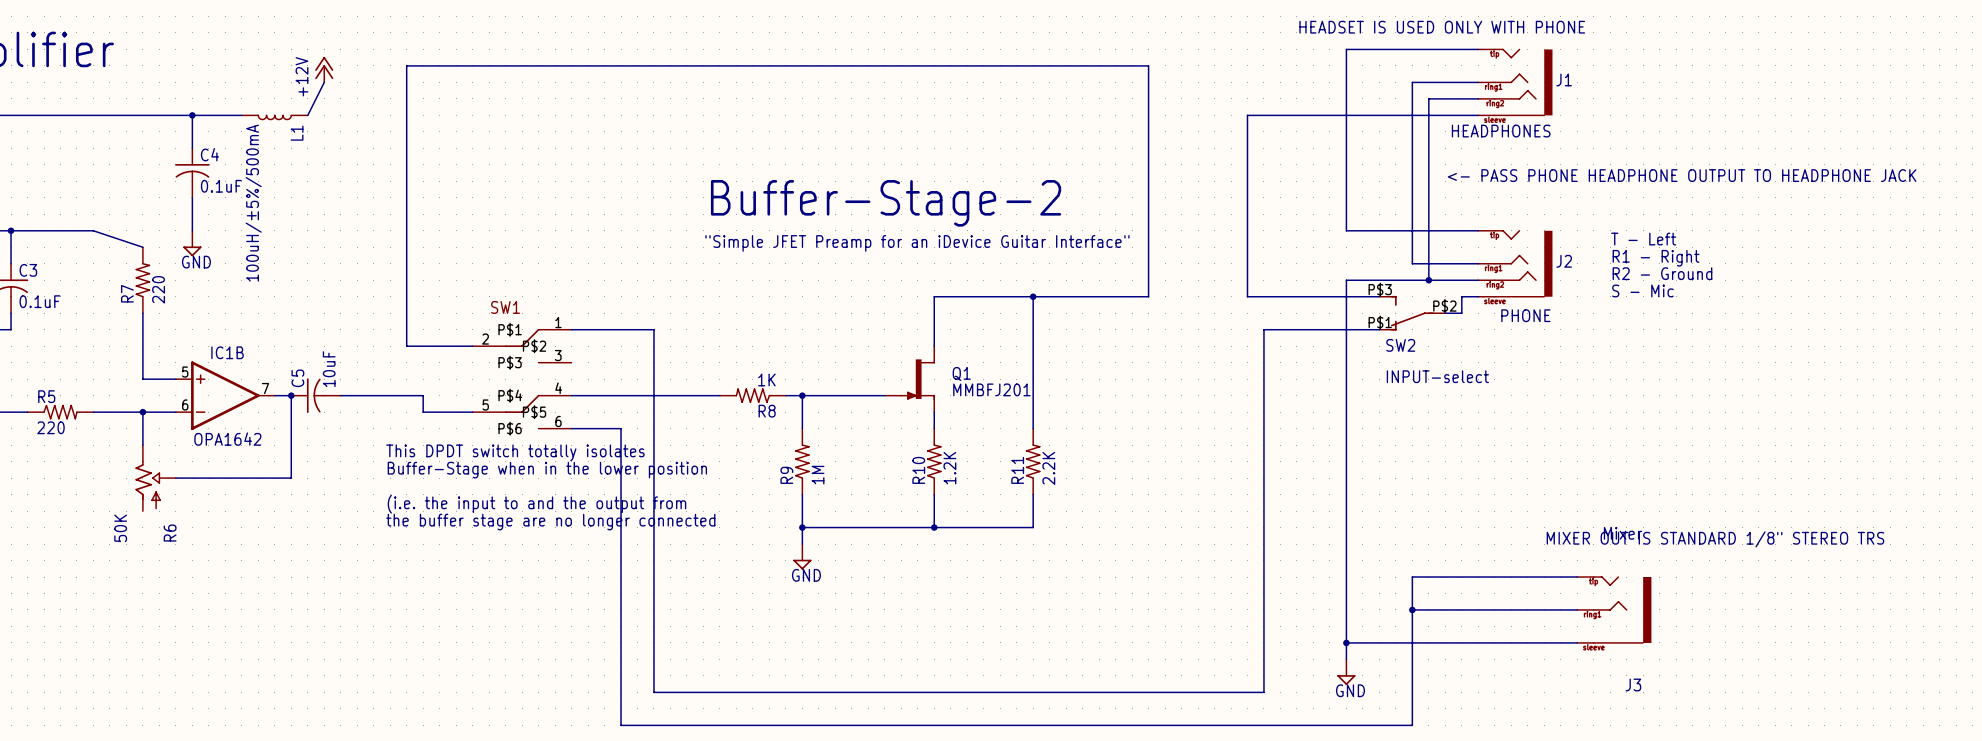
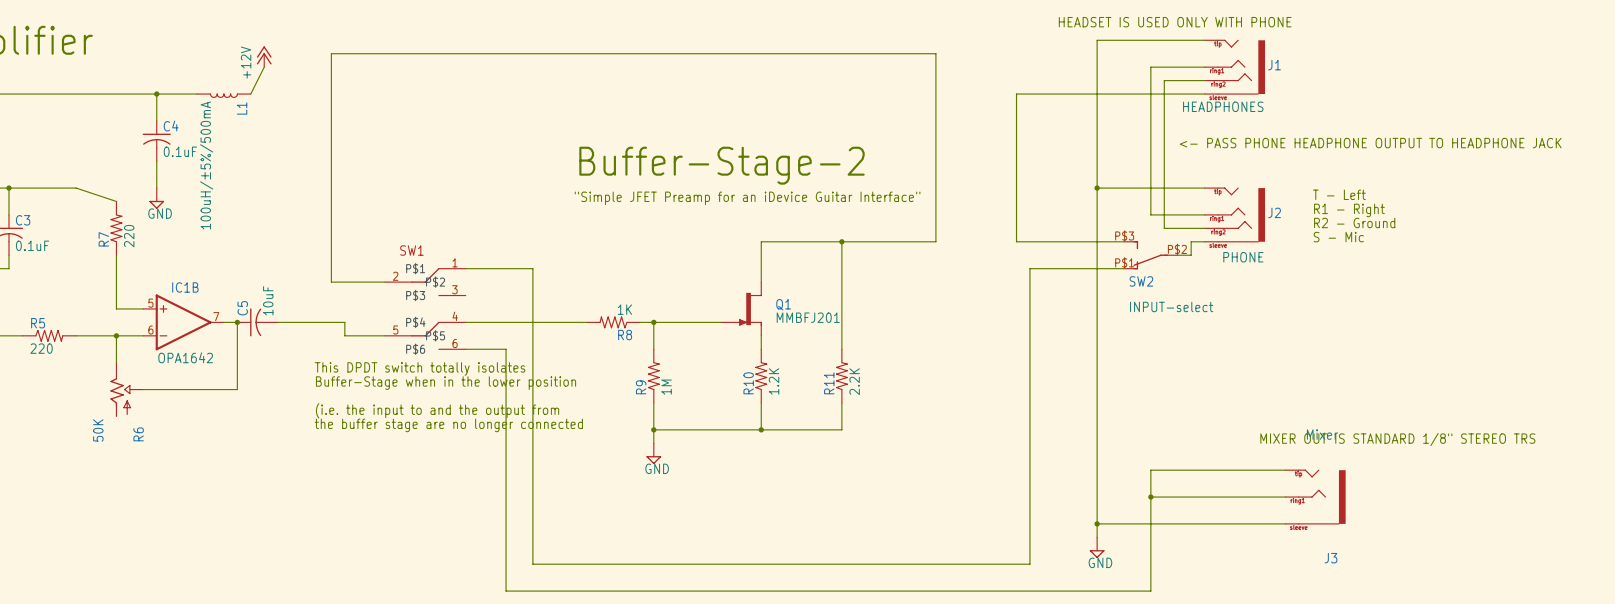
junction: none -> (1097, 188)
wire: (1346, 280) (1428, 280) -> (1097, 228) (1097, 188)
junction: (1428, 280) -> none

